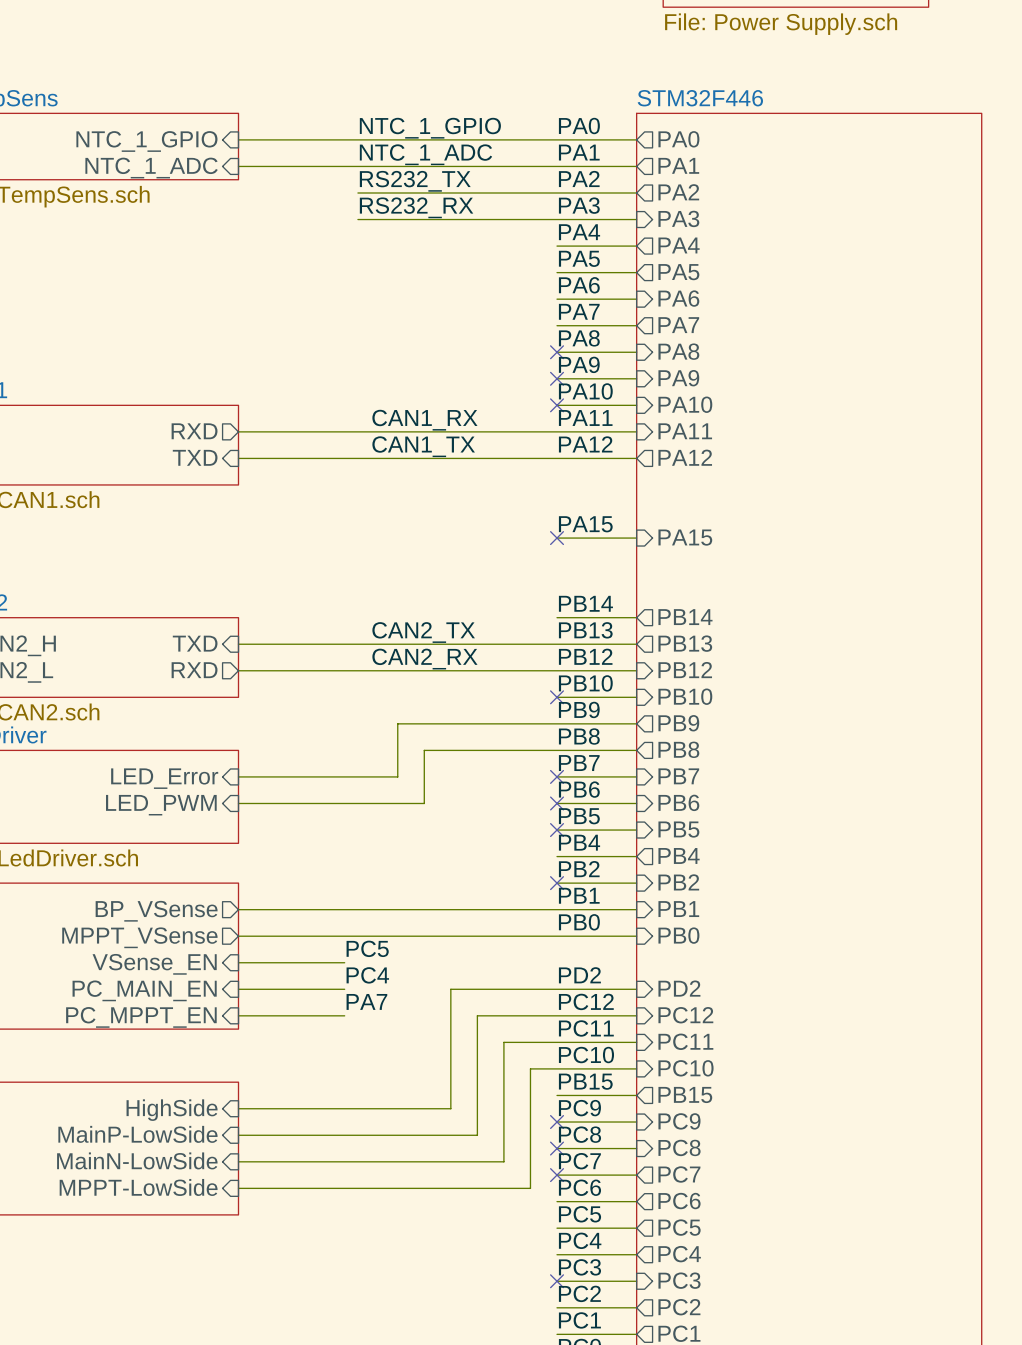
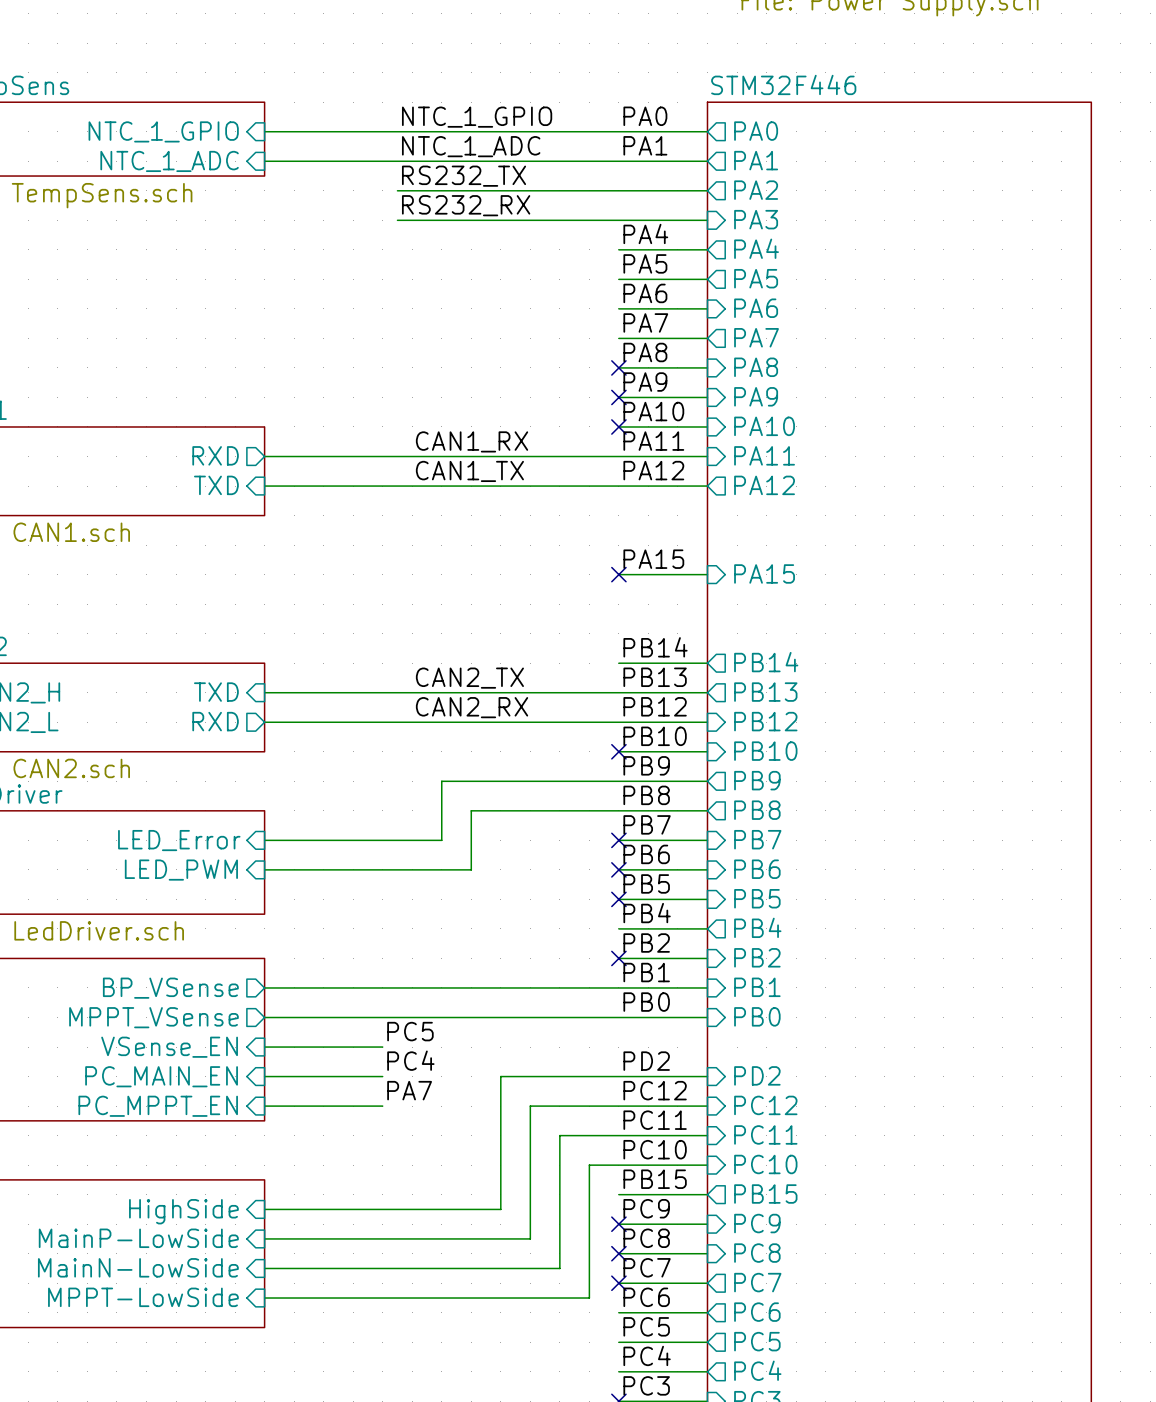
label: PA2 (579, 178) -> none
label: PA3 (579, 205) -> none

